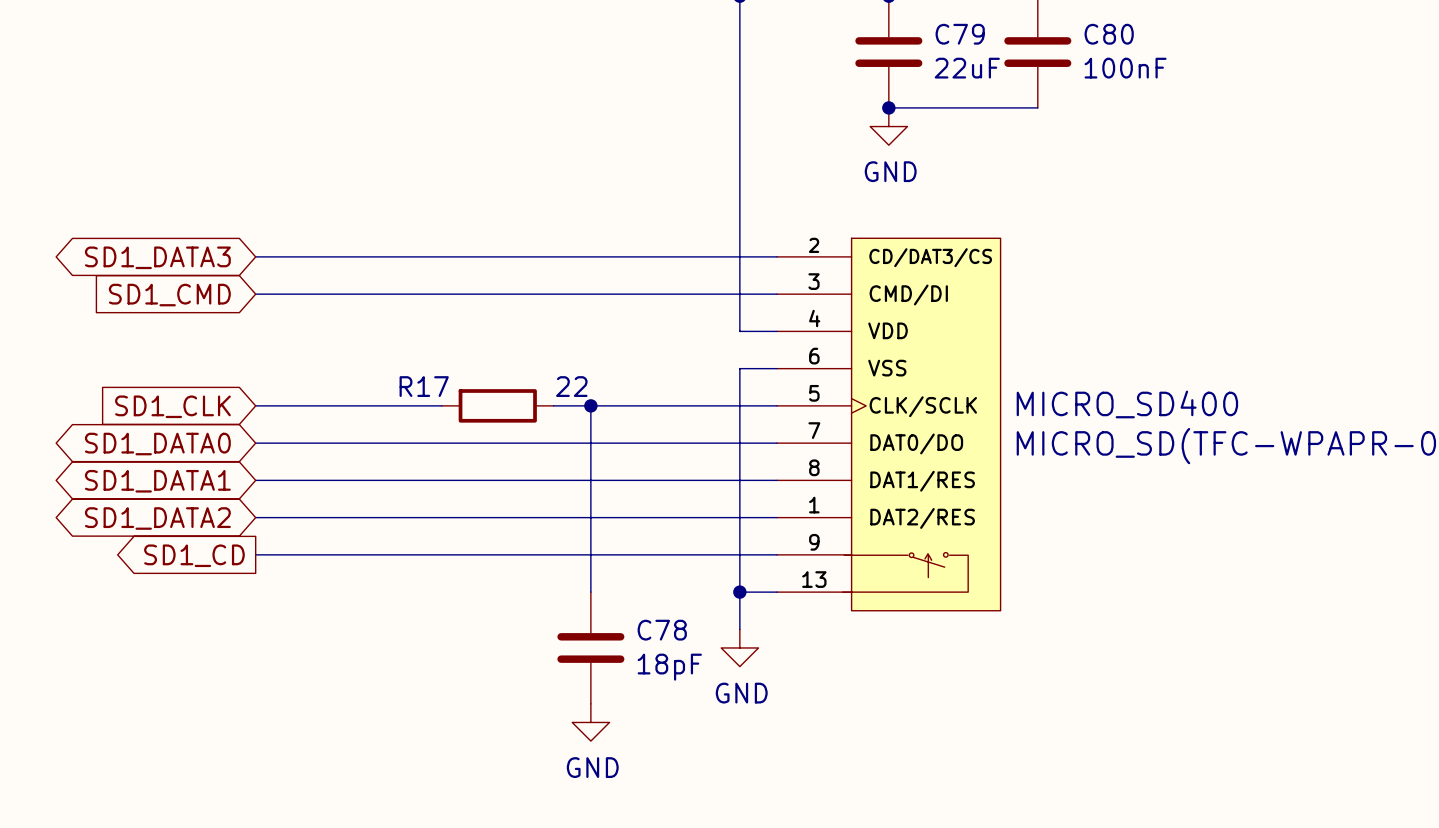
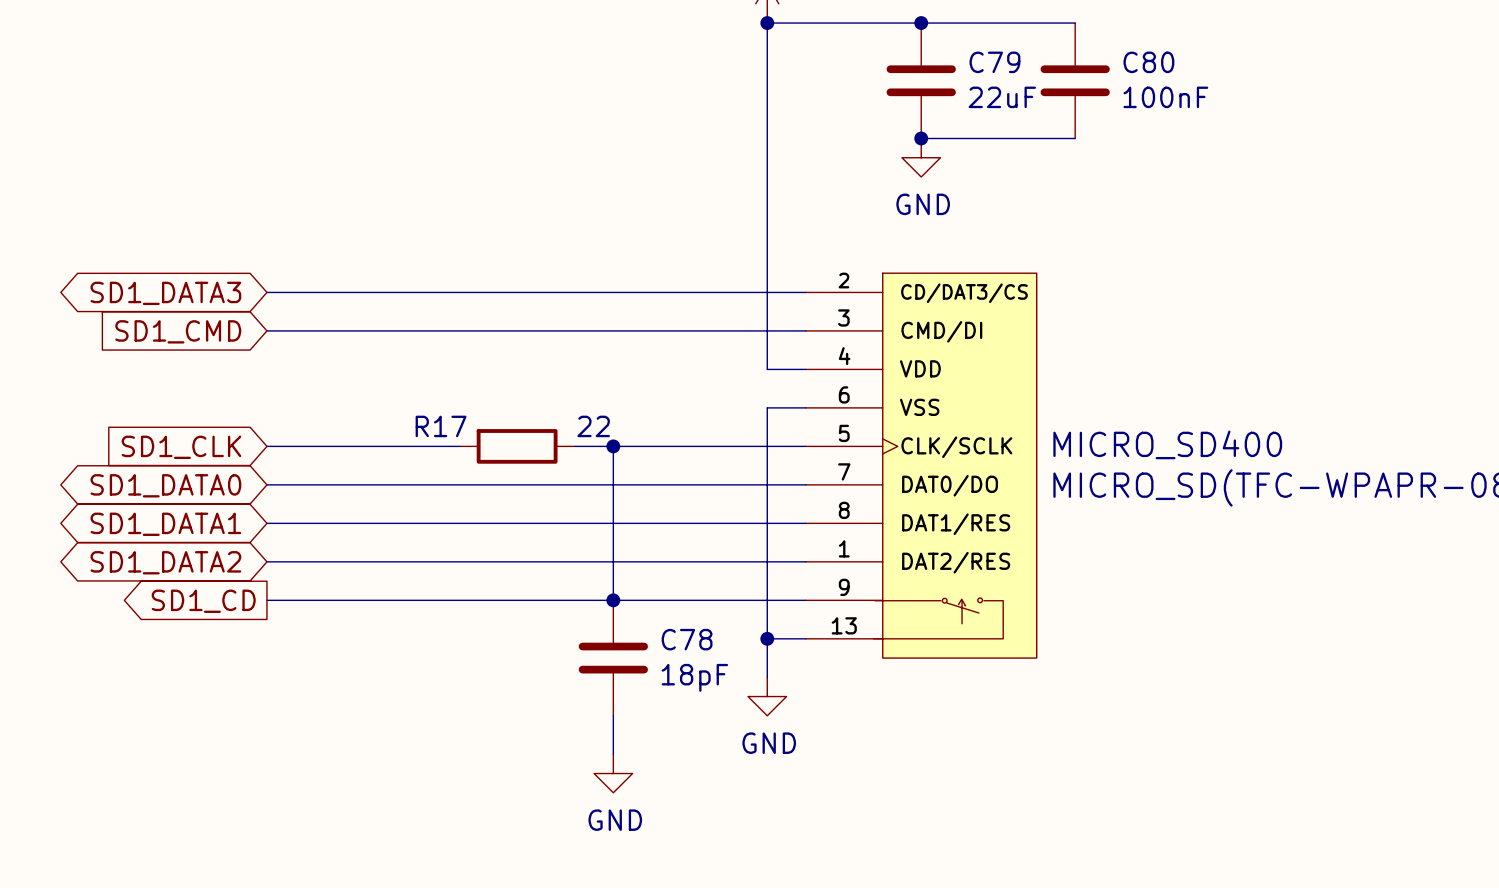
junction: none -> (613, 600)
C78 position: (590, 647) -> (613, 658)

